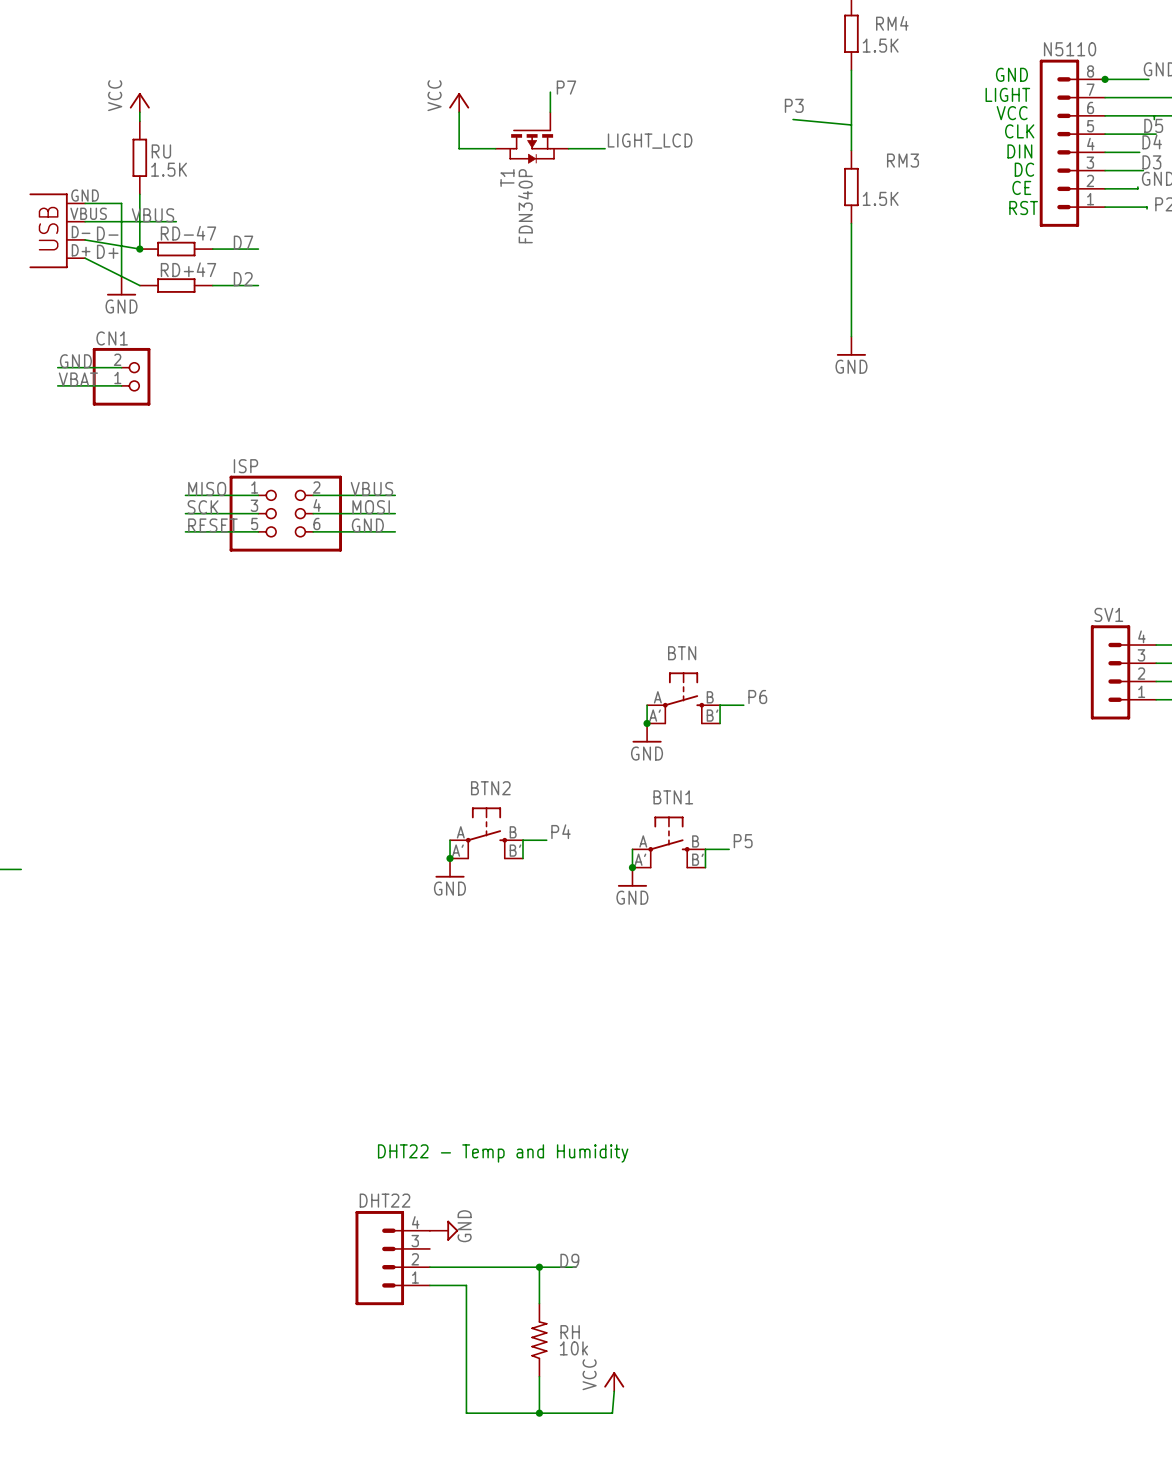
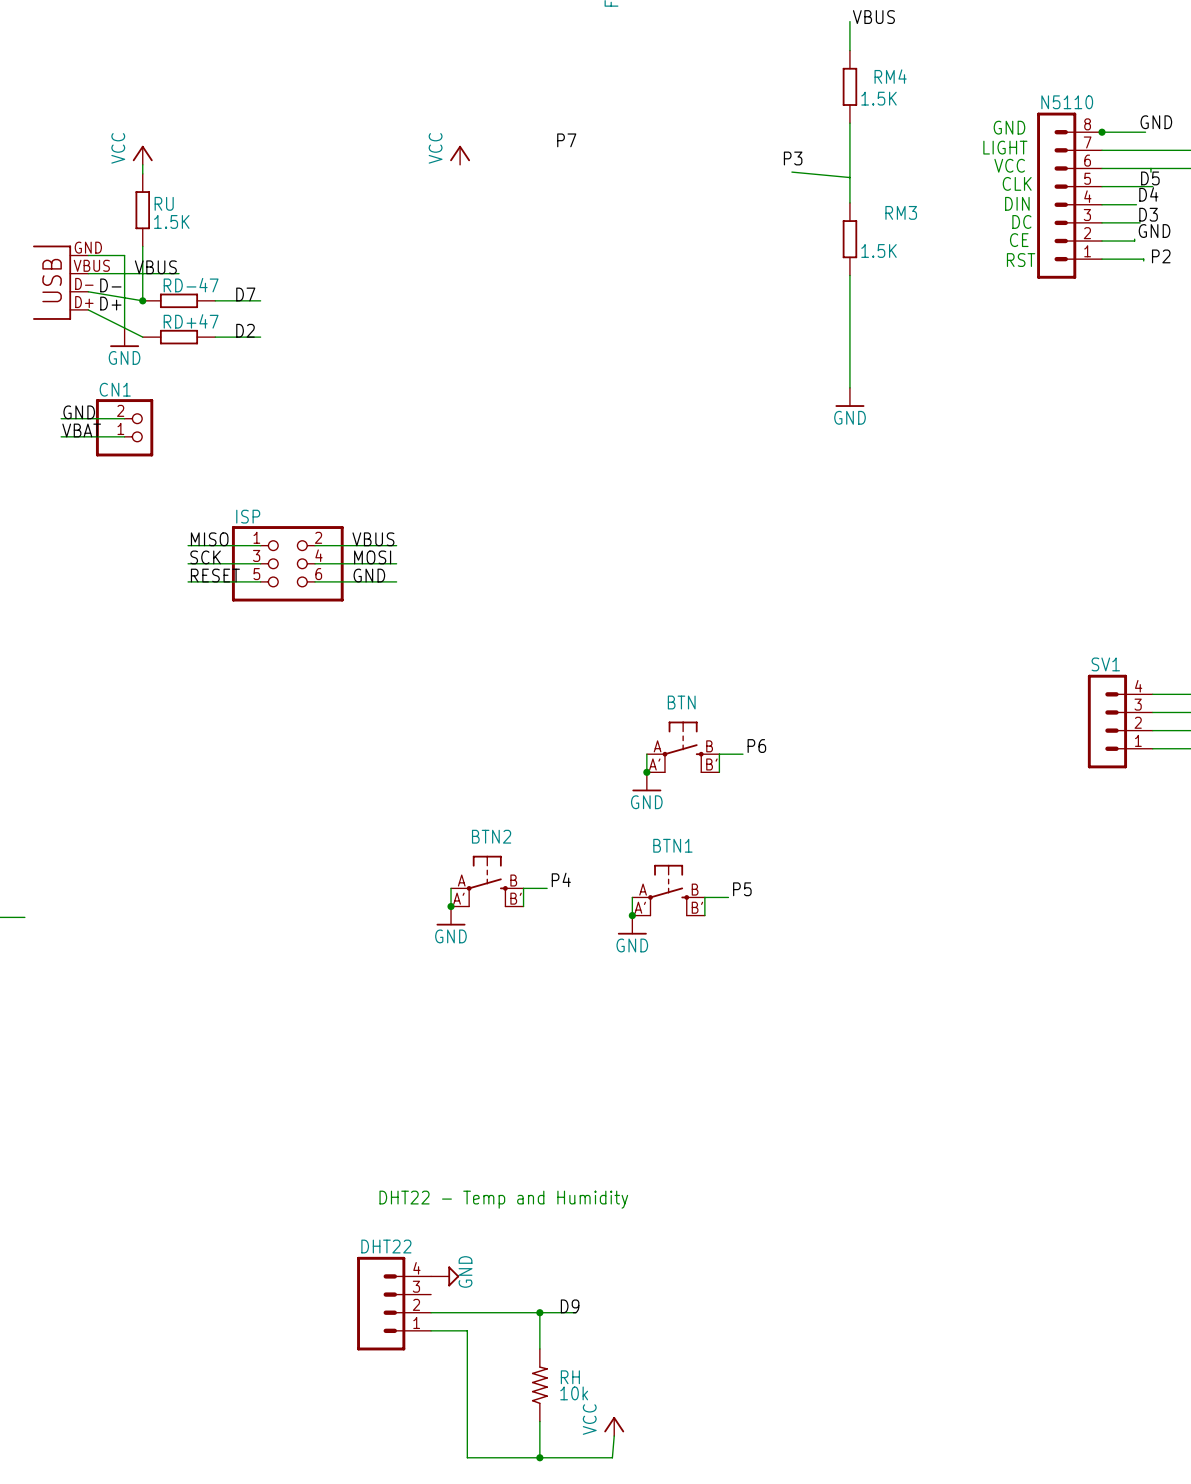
wire: (550, 92) (550, 112) -> none
wire: (459, 112) (459, 148) (495, 148) -> none
T1: FDN340P (532, 137) -> none
label: LIGHT_LCD (650, 141) -> none
wire: (568, 148) (605, 148) -> none

